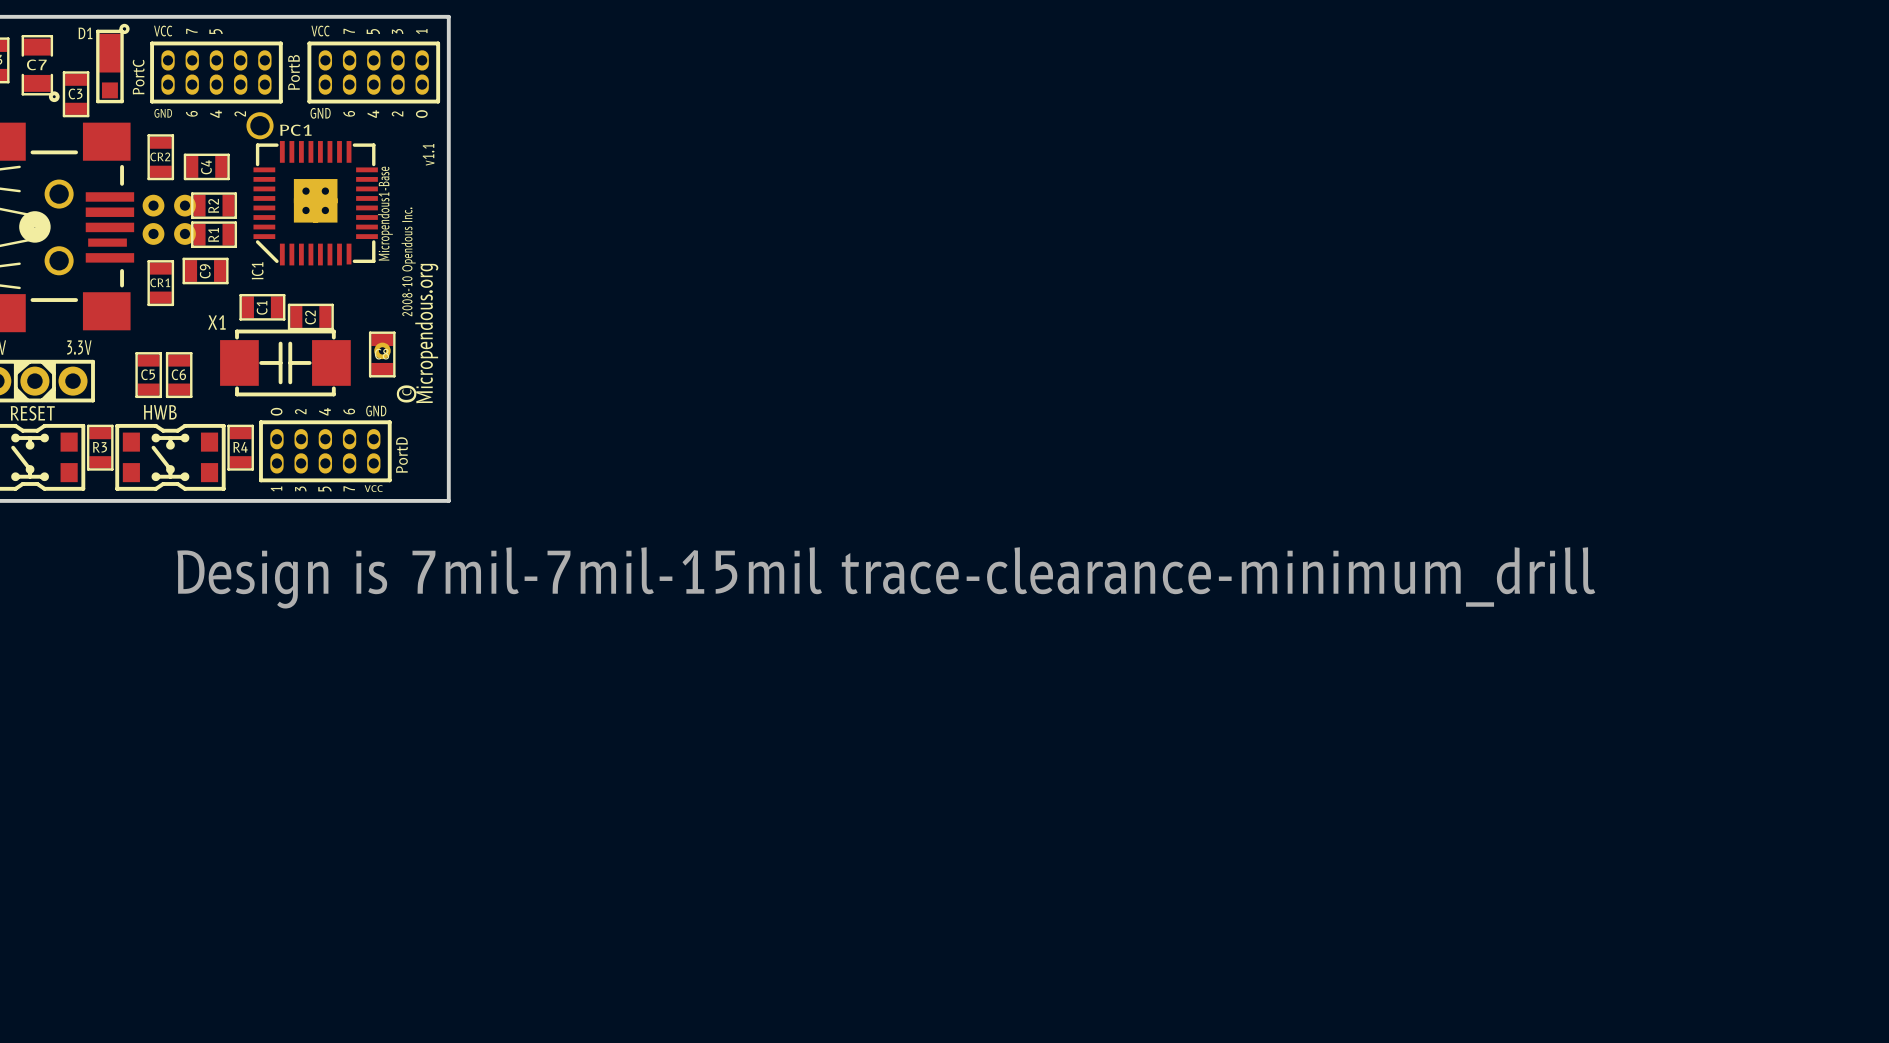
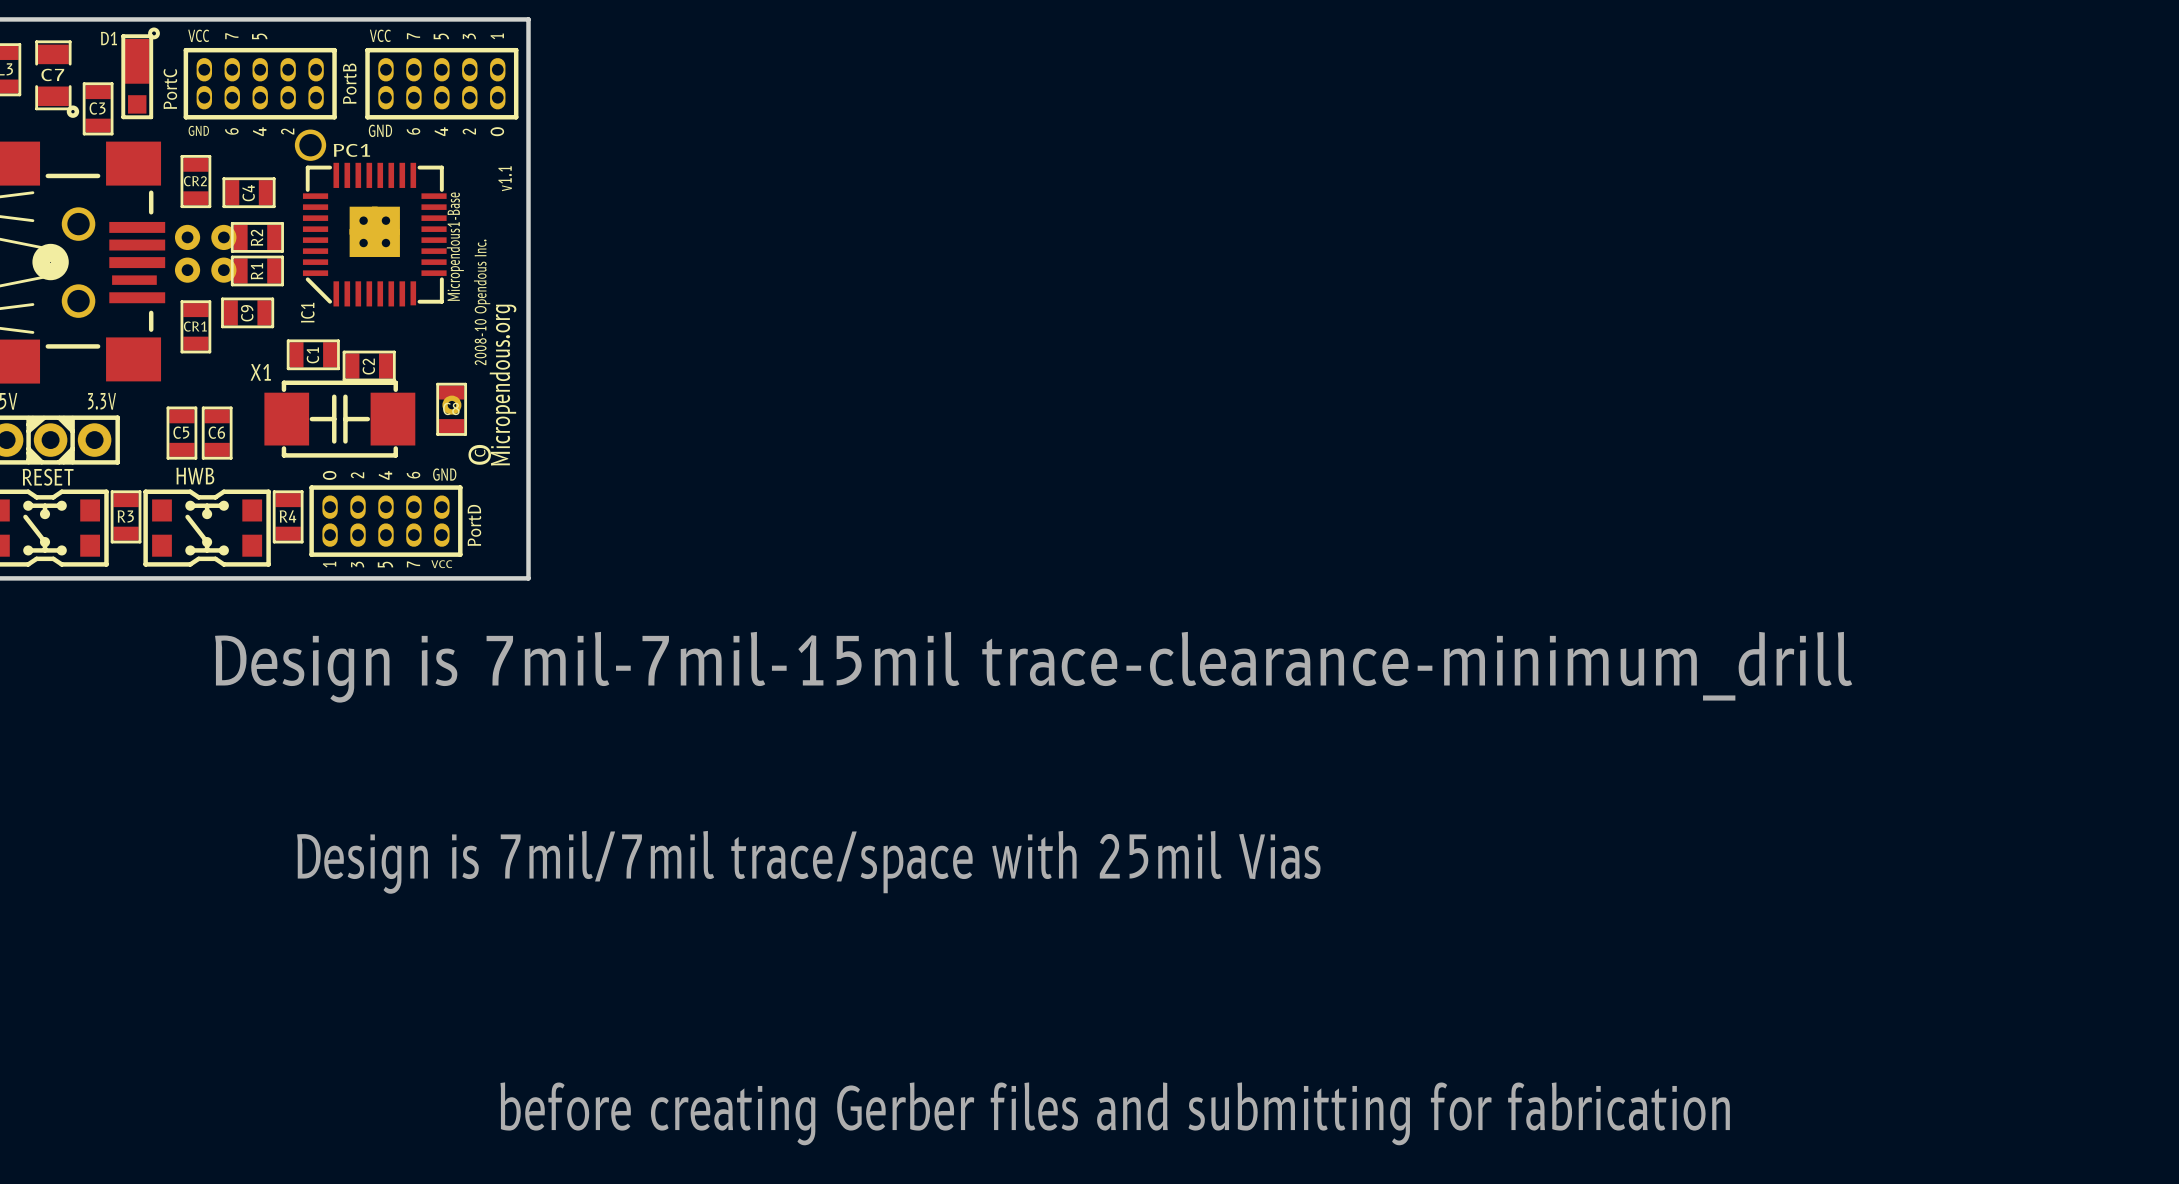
text: none -> Design is 7mil/7mil trace/space with 25mil Vias (808, 862)
text: none -> before creating Gerber files and submitting for fabrication (1115, 1113)

